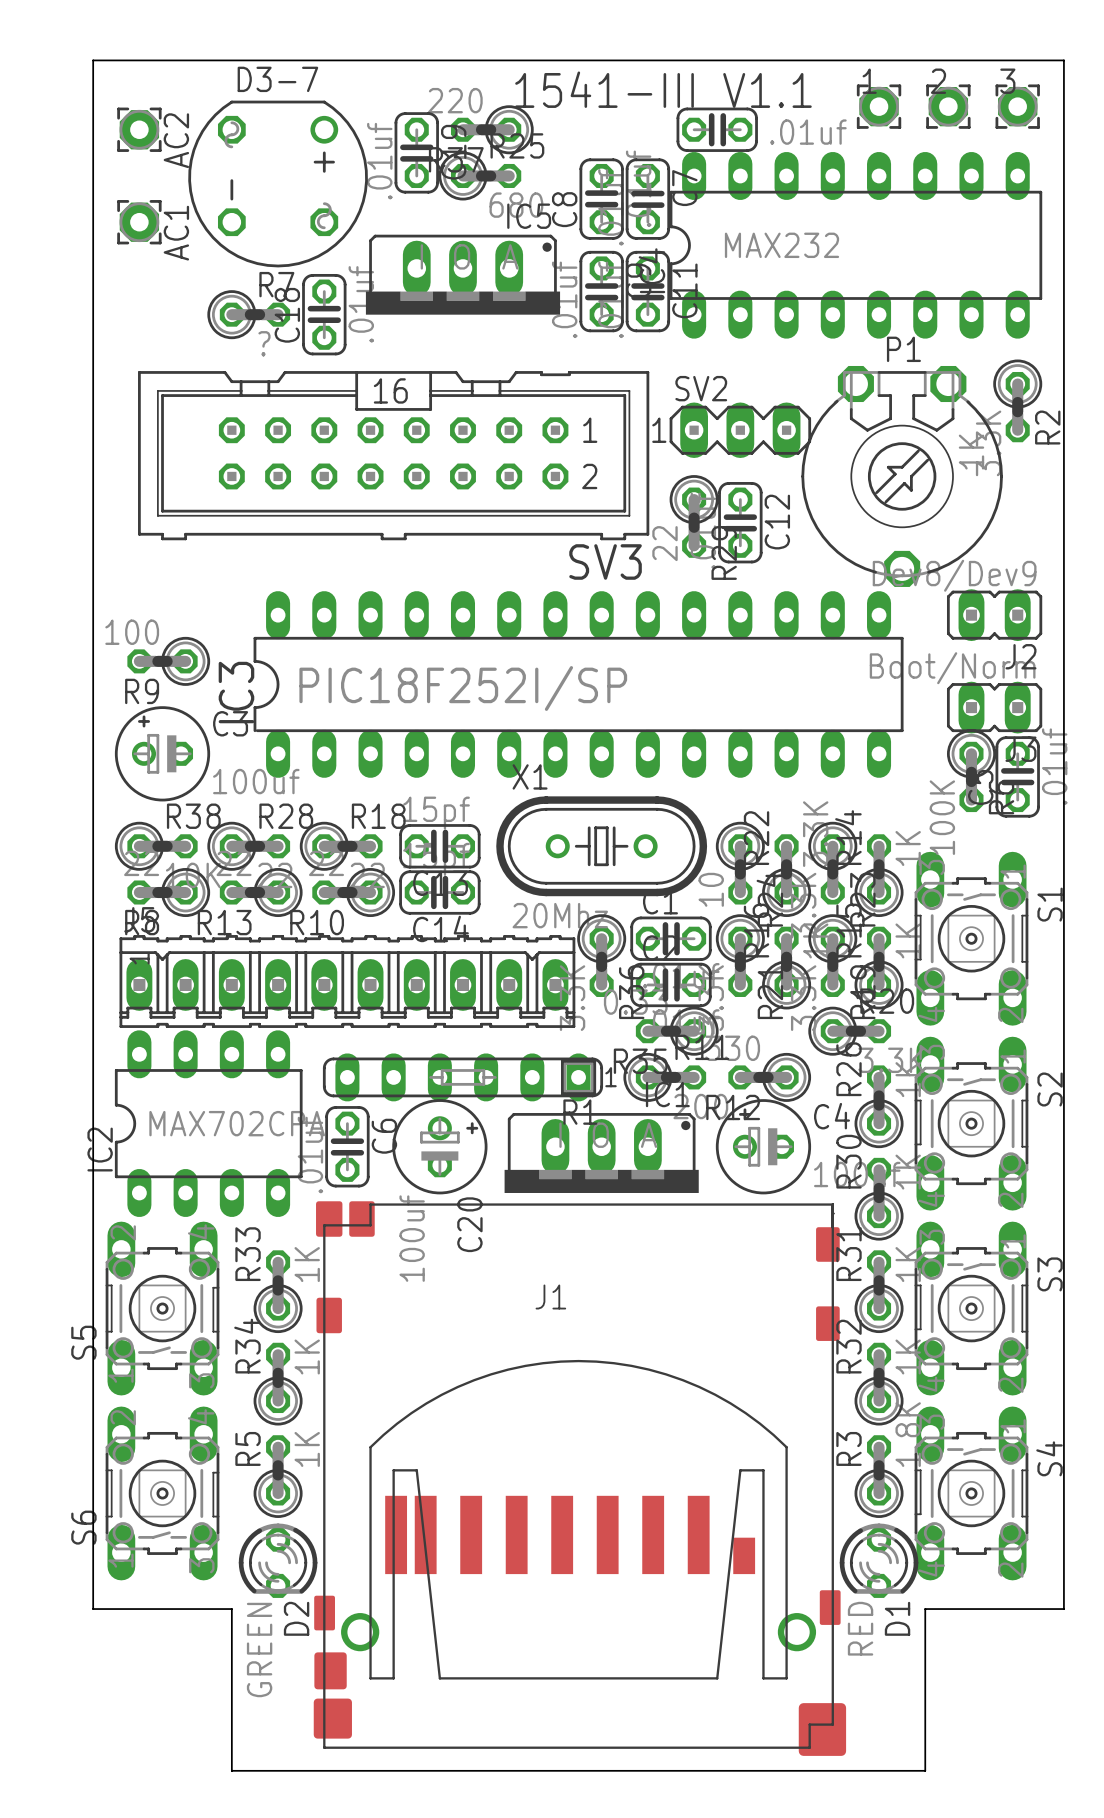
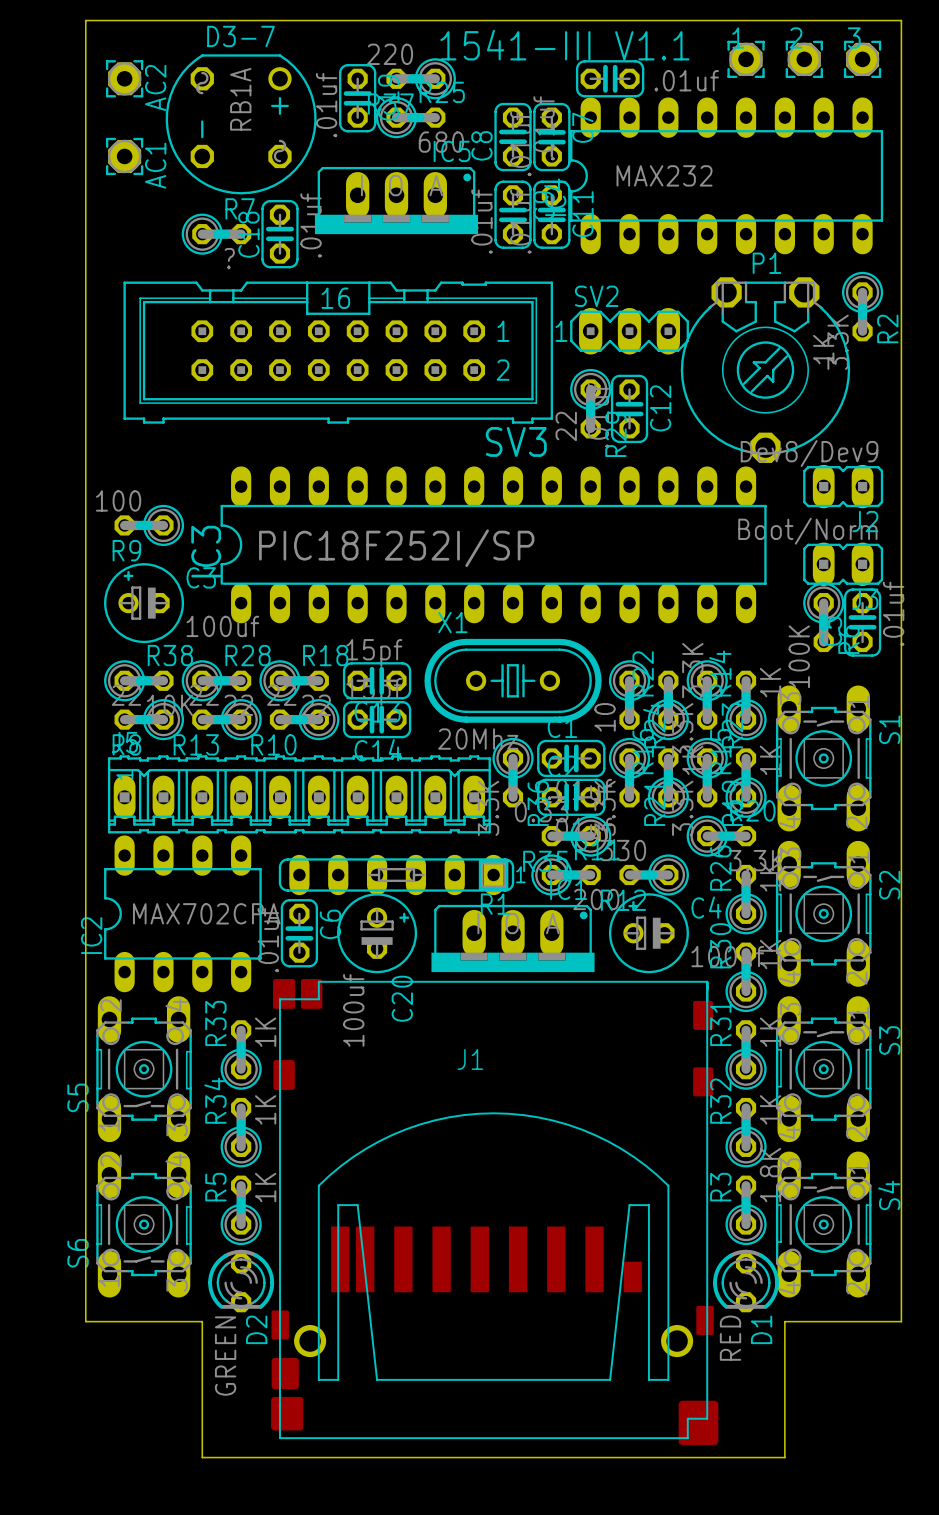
D3-7 value: none -> RB1A (240, 99)

